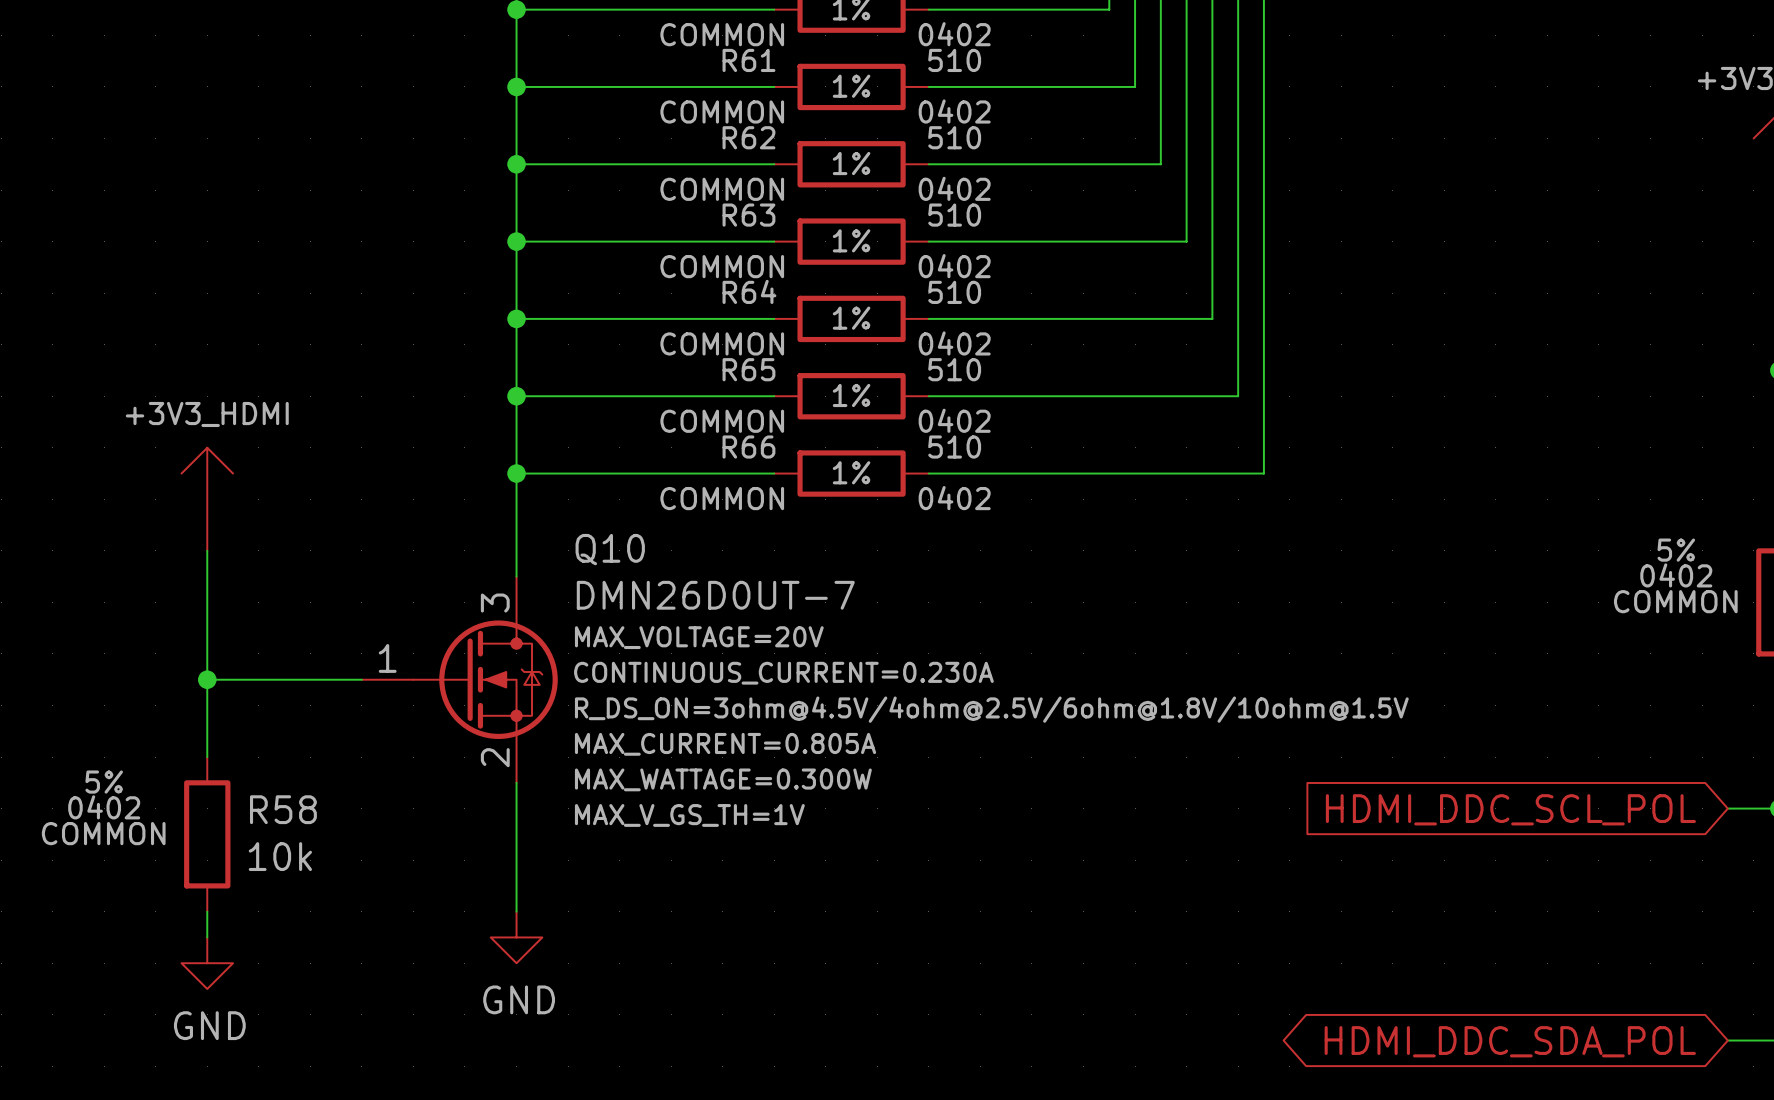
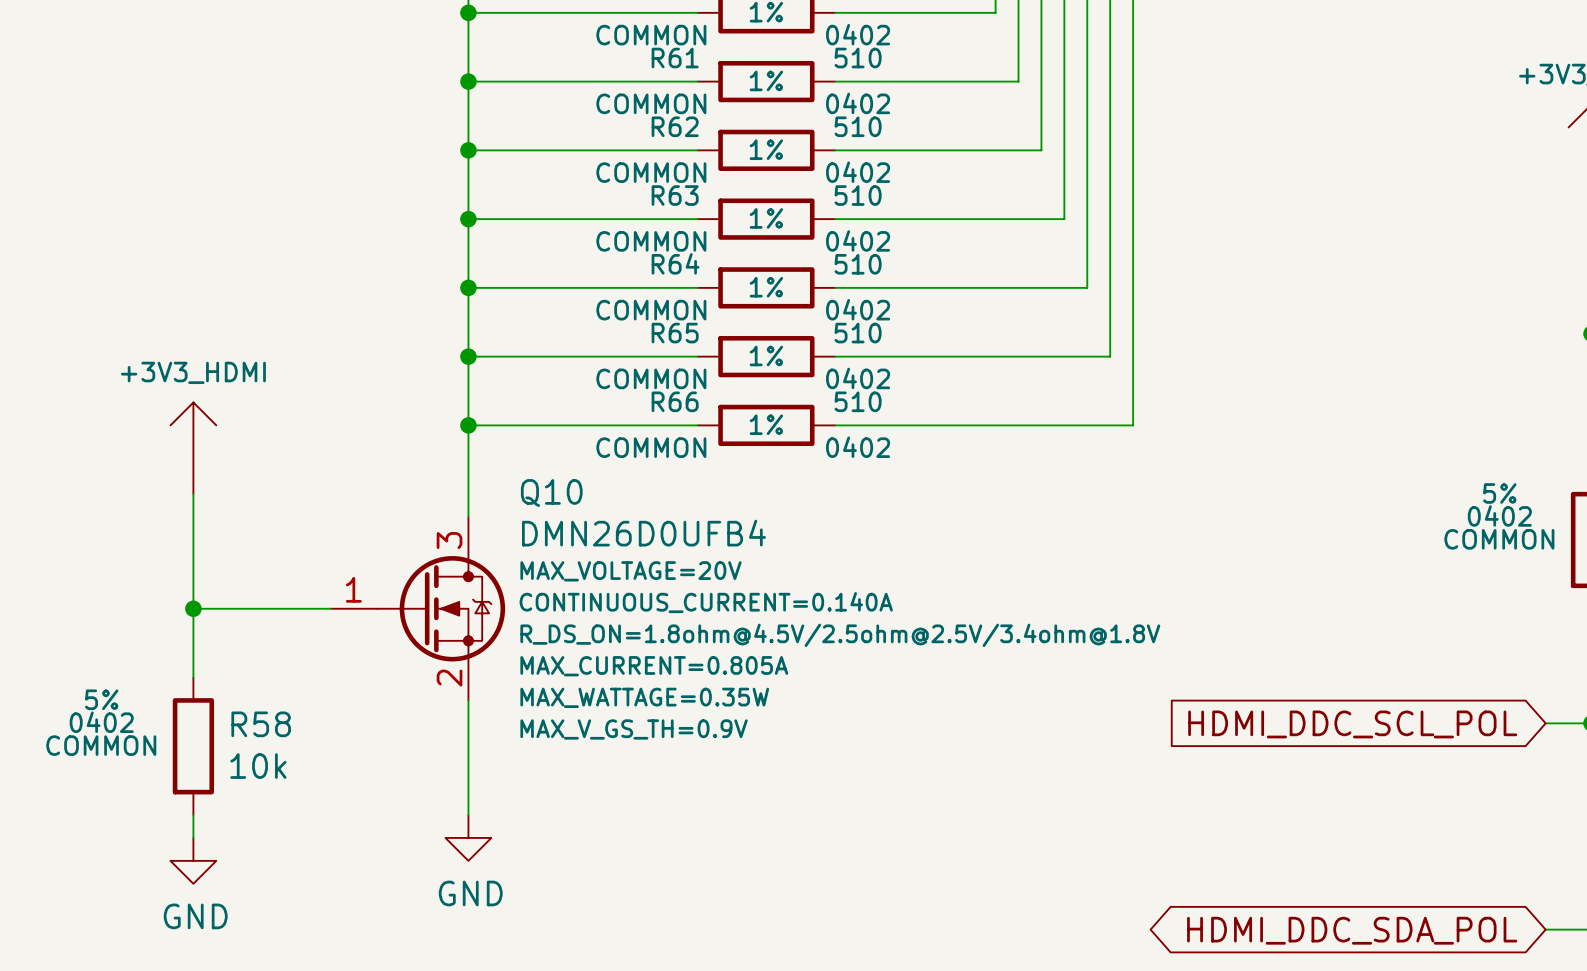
Q10 value: DMN26D0UT-7 (715, 595) -> DMN26D0UFB4 (643, 533)
Q10 text: CONTINUOUS_CURRENT=0.230A (783, 673) -> CONTINUOUS_CURRENT=0.140A (706, 602)
Q10 text: R_DS_ON=3ohm@4.5V/4ohm@2.5V/6ohm@1.8V/10ohm@1.5V (991, 709) -> R_DS_ON=1.8ohm@4.5V/2.5ohm@2.5V/3.4ohm@1.8V (840, 635)
Q10 text: MAX_WATTAGE=0.300W (723, 779) -> MAX_WATTAGE=0.35W (644, 697)
Q10 text: MAX_V_GS_TH=1V (689, 815) -> MAX_V_GS_TH=0.9V (634, 729)

